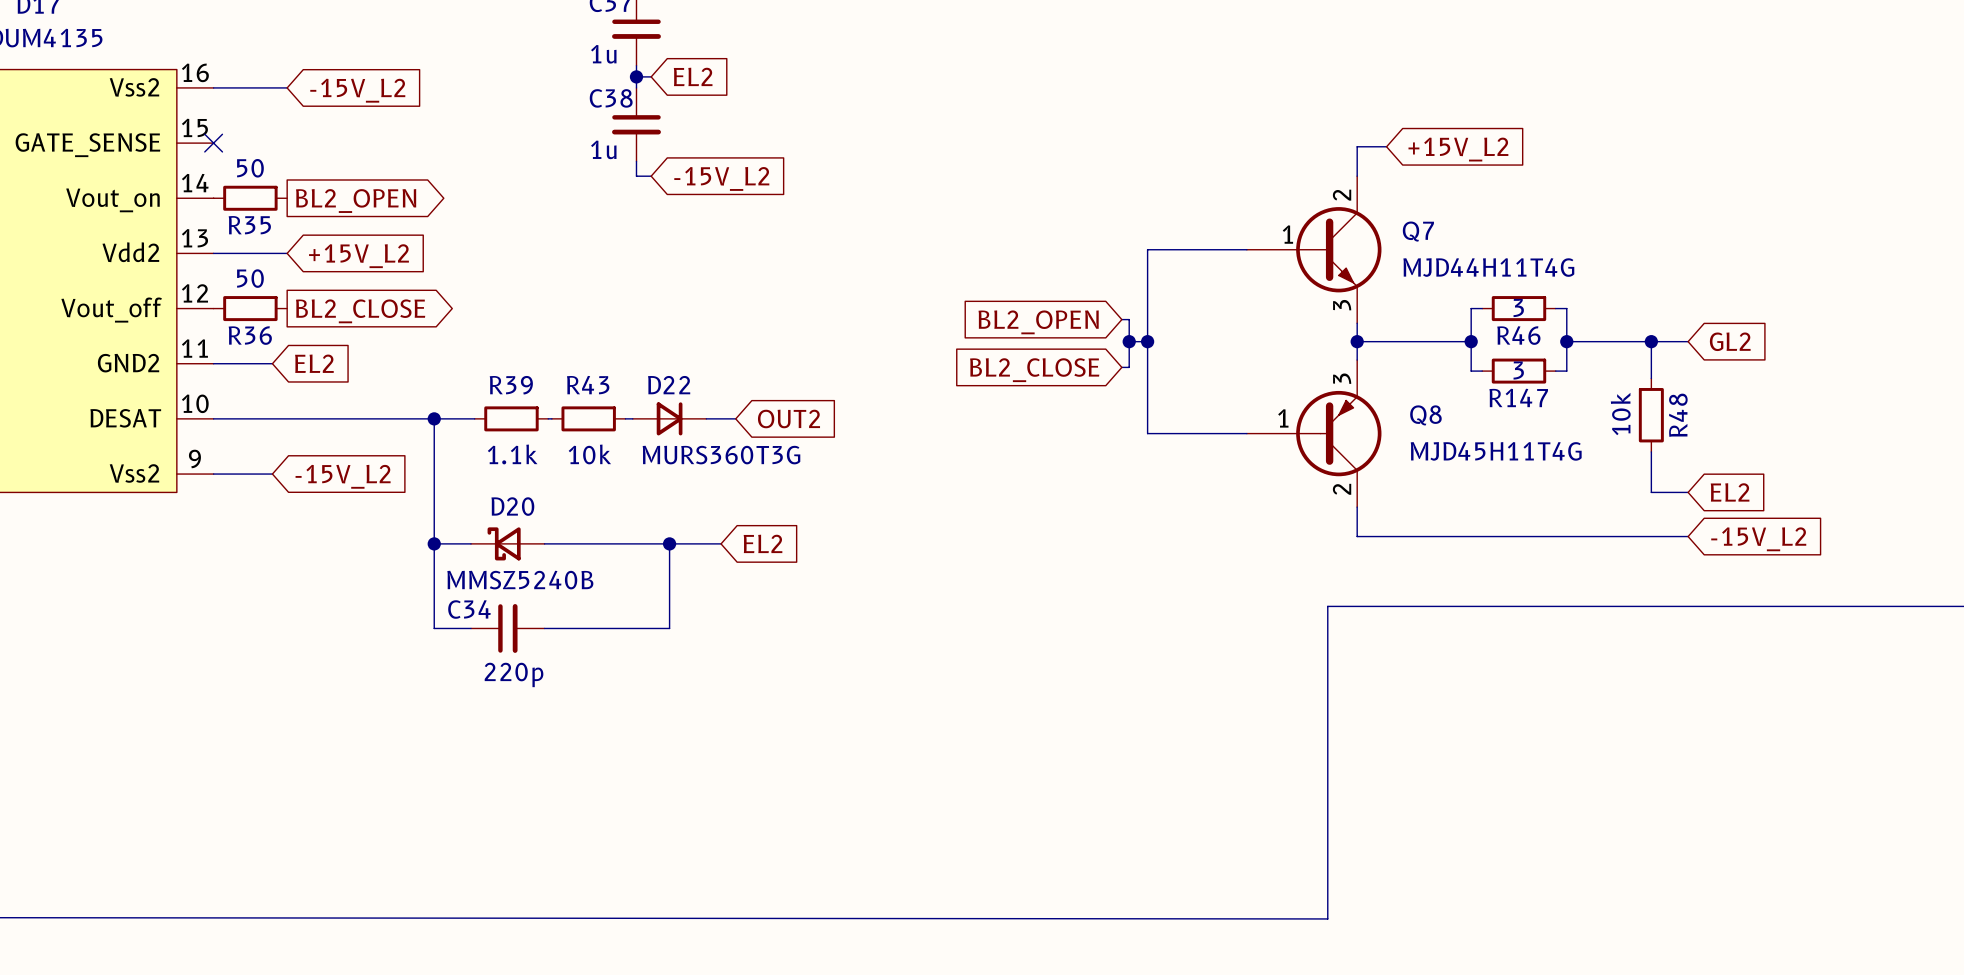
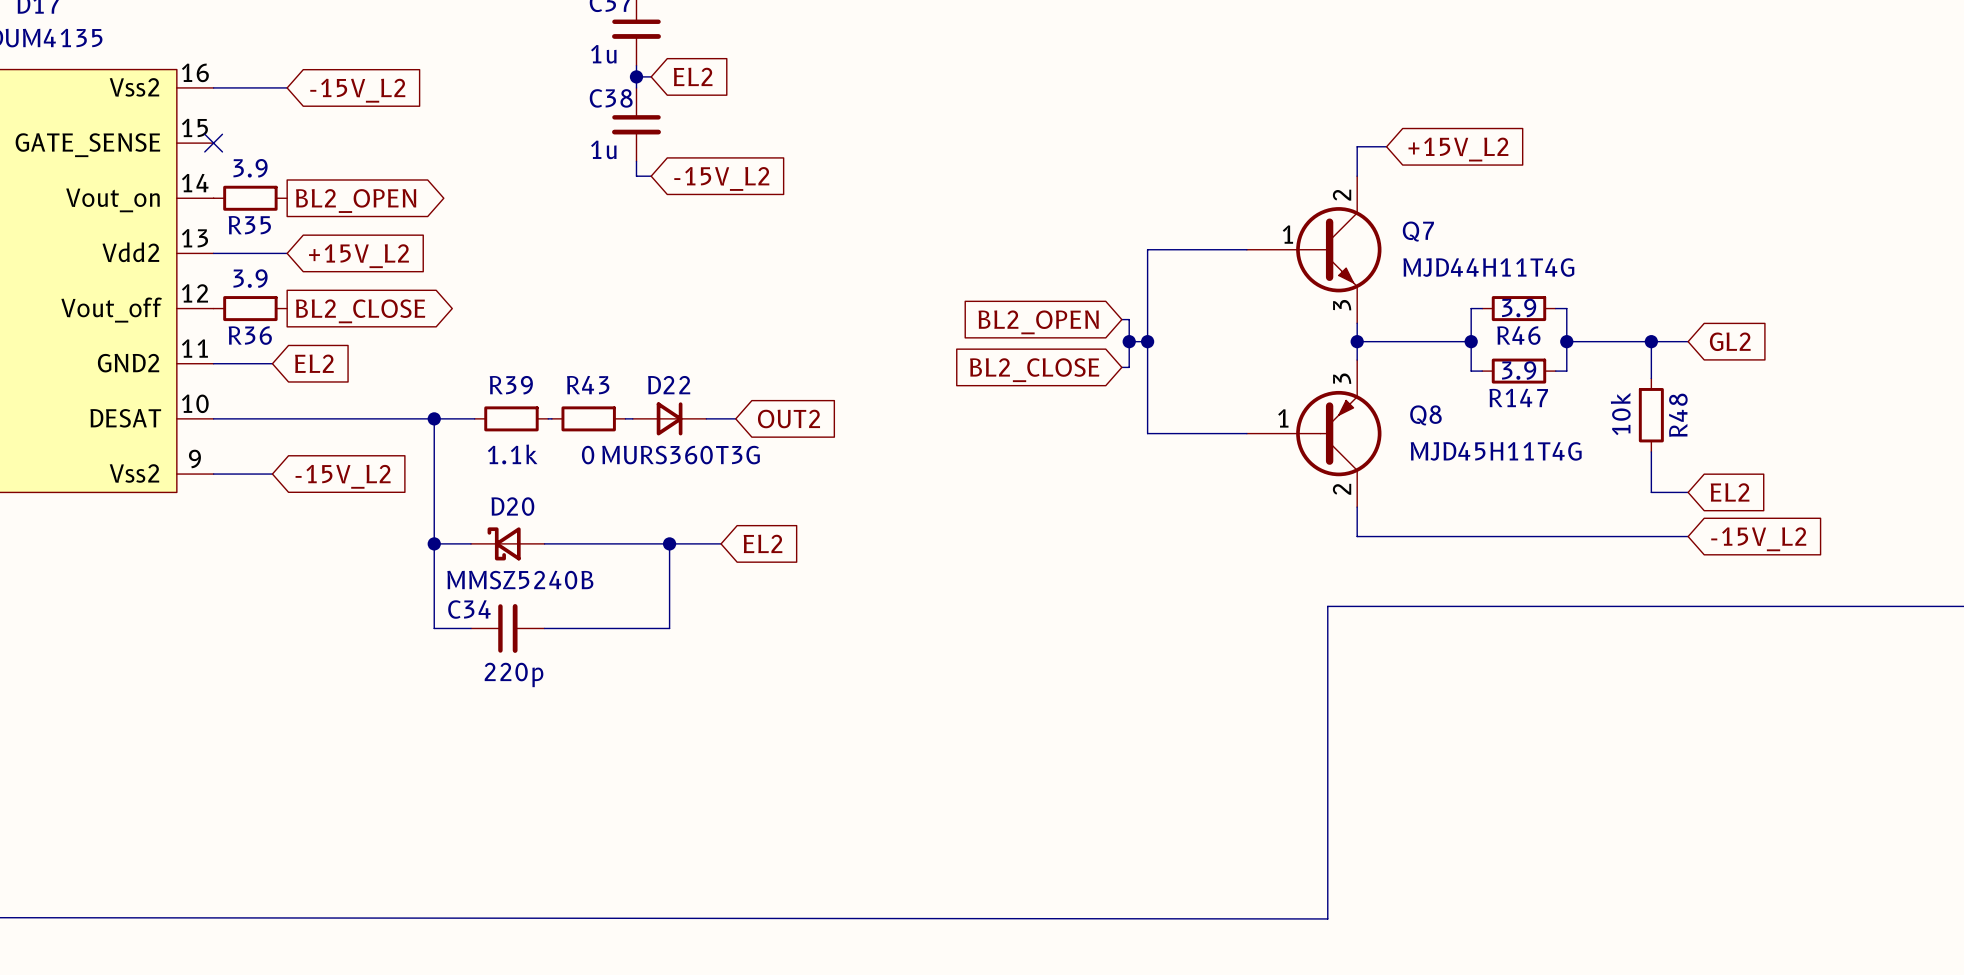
R35 value: 50 (250, 168) -> 3.9 (250, 168)
R36 value: 50 (250, 278) -> 3.9 (250, 278)
R46 value: 3 (1518, 308) -> 3.9 (1519, 308)
R147 value: 3 (1518, 370) -> 3.9 (1519, 370)
R43 value: 10k (589, 454) -> 0 (588, 455)
D22 value position: MURS360T3G (721, 455) -> MURS360T3G (681, 455)

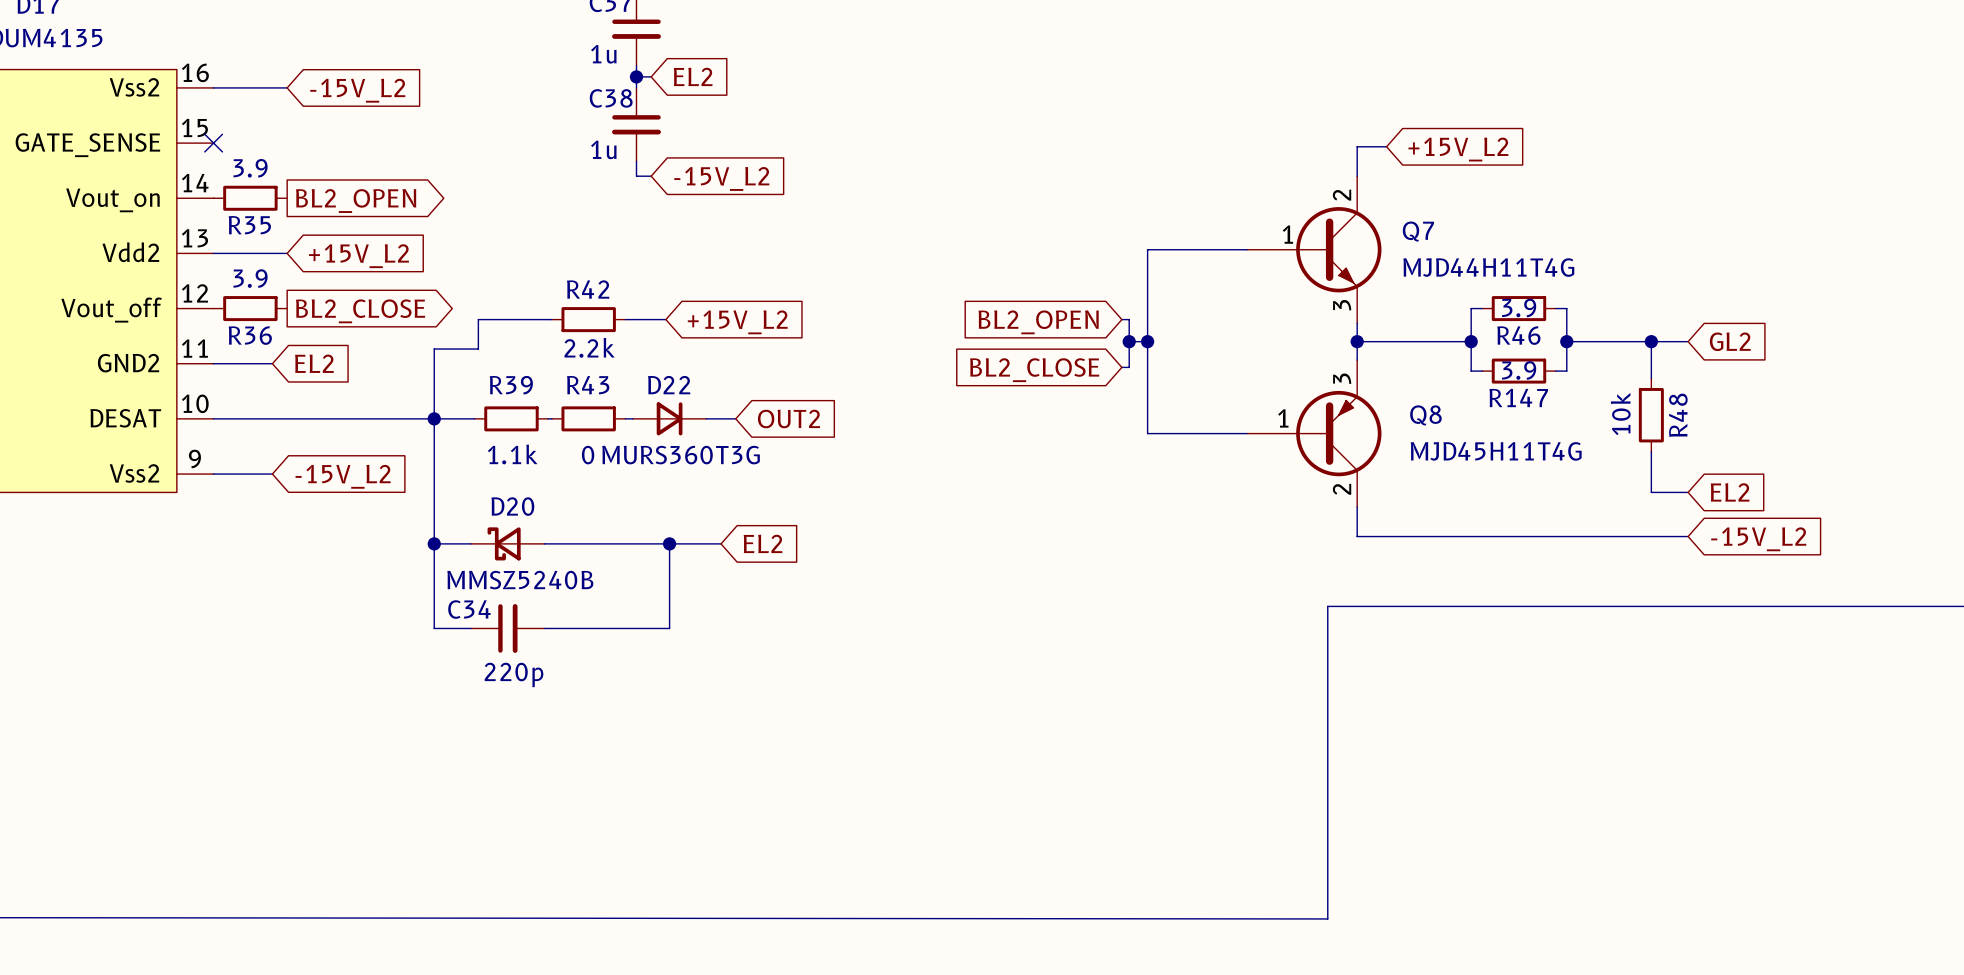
wire: none -> (551, 319) (478, 319) (478, 349) (434, 349) (434, 418)
R42: none -> 2.2k (588, 319)
wire: none -> (625, 319) (665, 319)
global label: none -> +15V_L2 (737, 322)

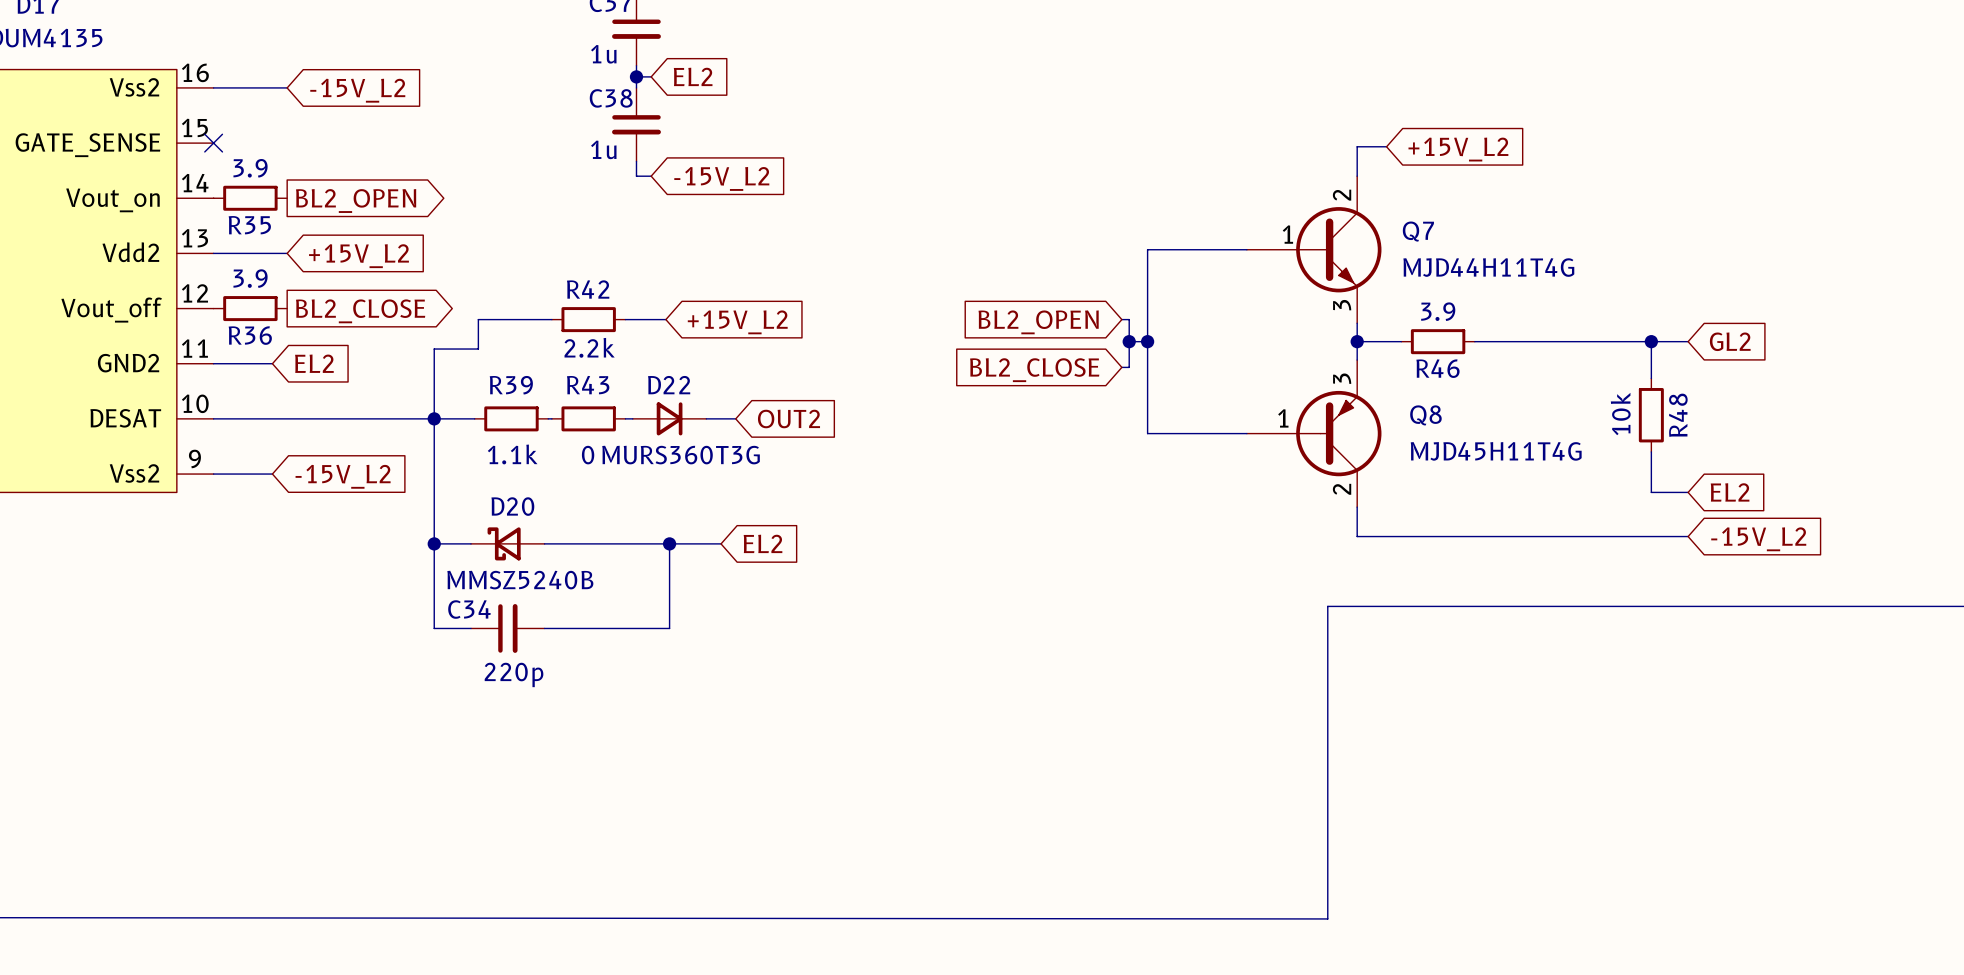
wire: (1482, 308) (1471, 308) (1471, 371) (1482, 371) -> none
R46 position: (1518, 308) -> (1438, 341)
R46 value position: 3.9 (1519, 308) -> 3.9 (1438, 311)
wire: (1555, 308) (1566, 308) (1566, 371) (1555, 371) -> none
wire: (1401, 341) (1471, 341) -> none
junction: (1471, 341) -> none
wire: none -> (1474, 341) (1566, 341)
junction: (1566, 341) -> none
R147: 3.9 (1518, 371) -> none

